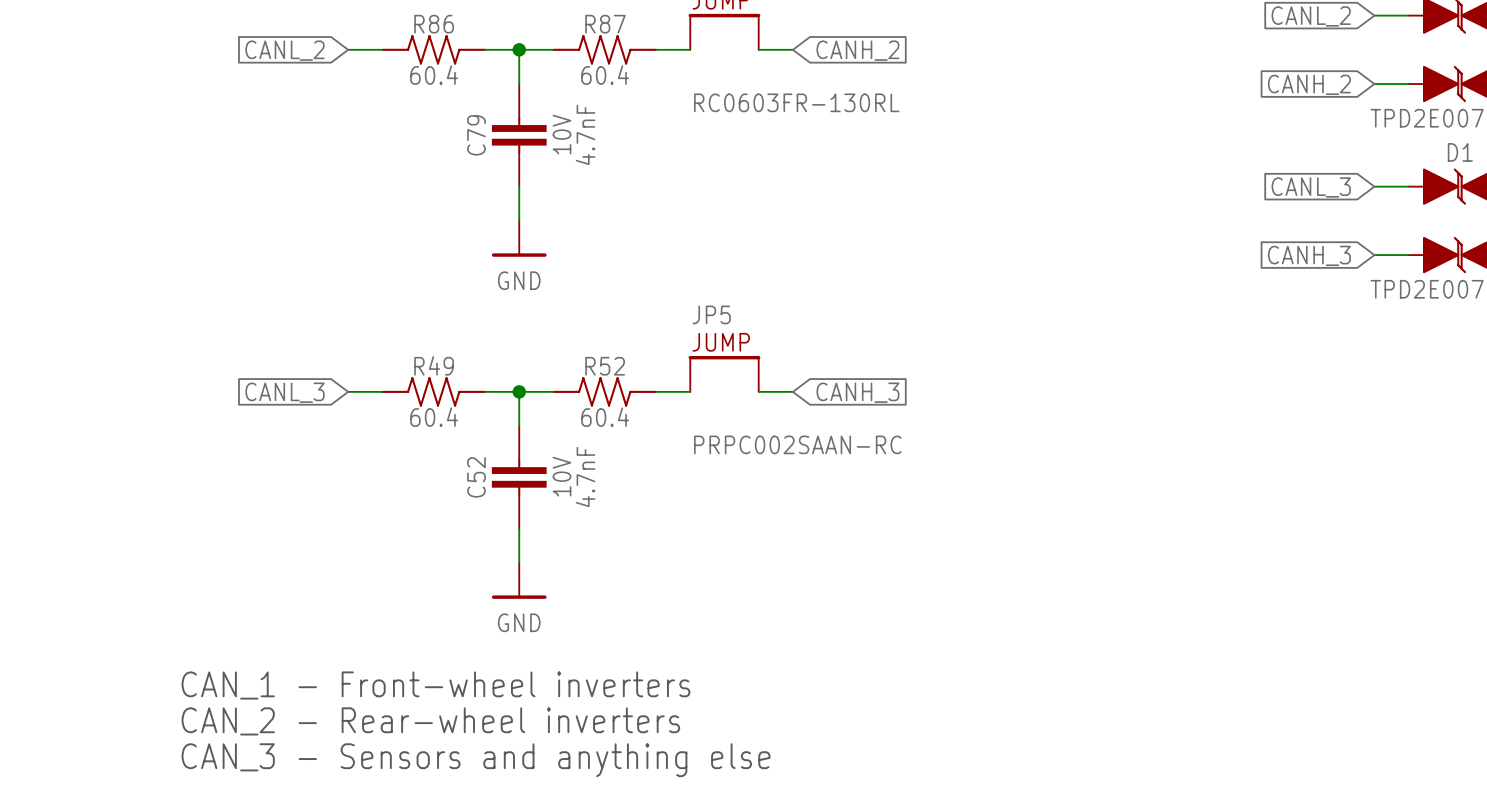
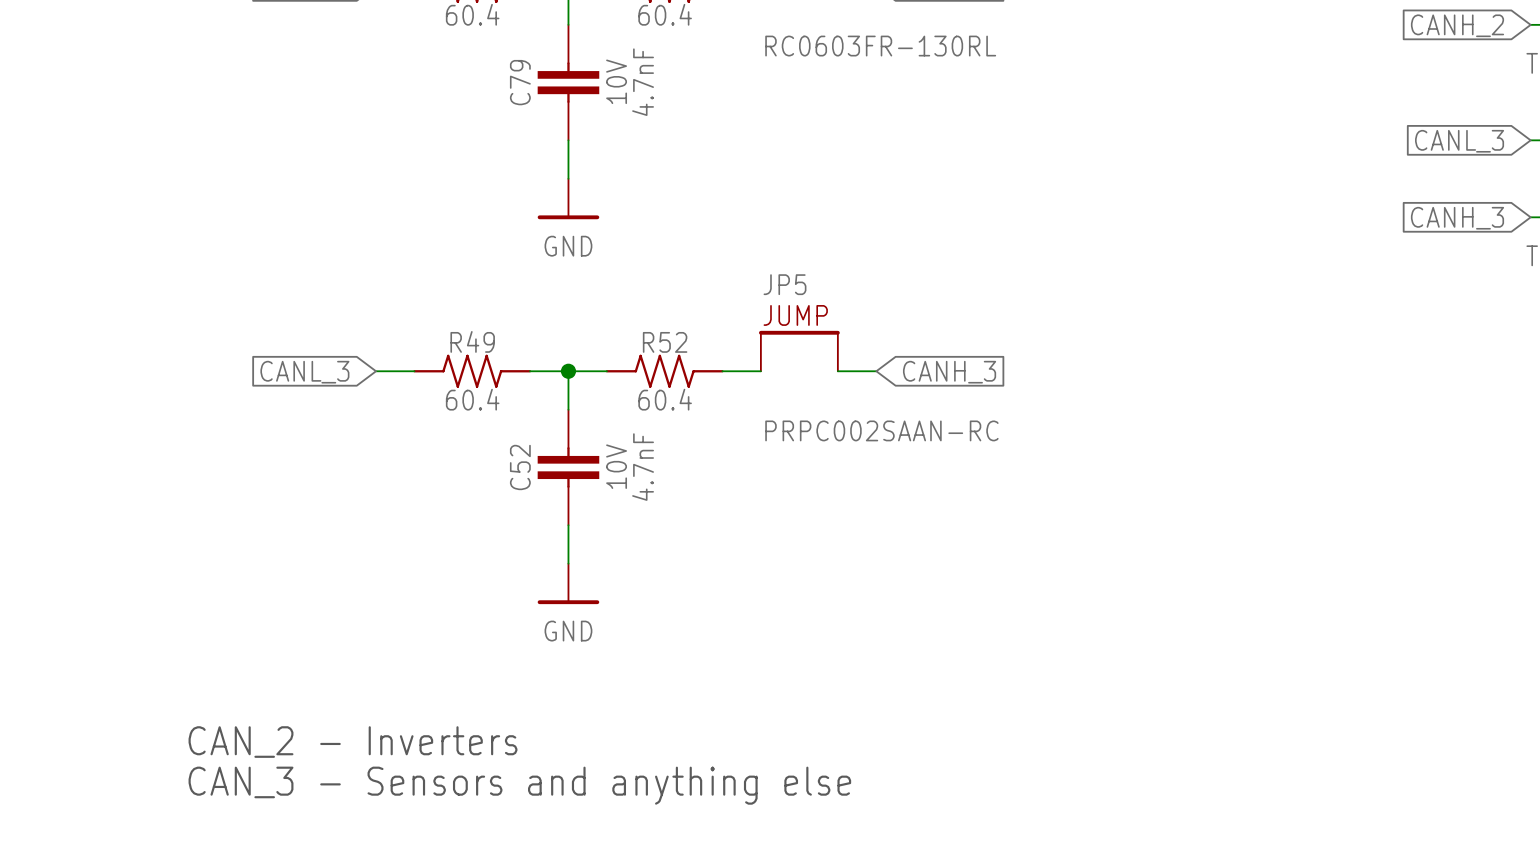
text: CAN_1 - Front-wheel inverters (436, 685) -> none
text: CAN_2 - Rear-wheel inverters (430, 721) -> CAN_2 - Inverters (353, 742)

